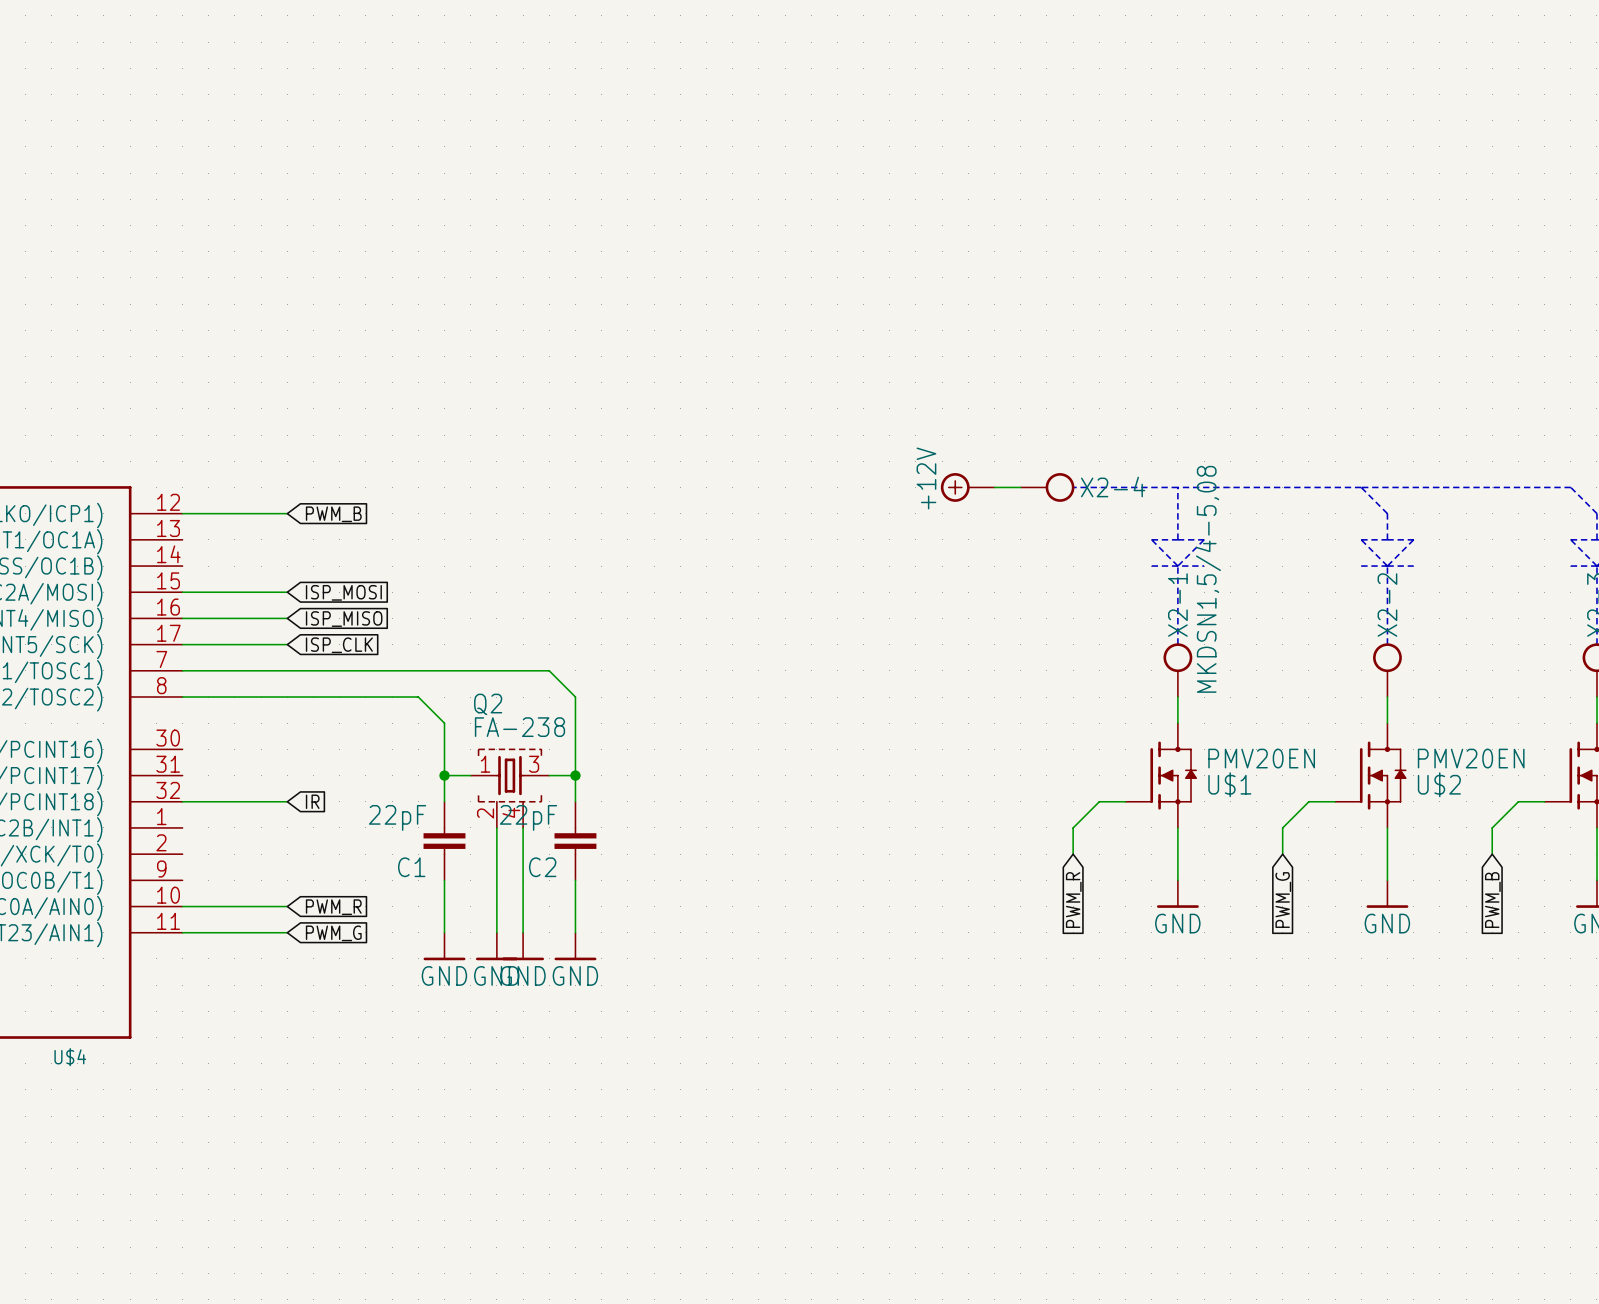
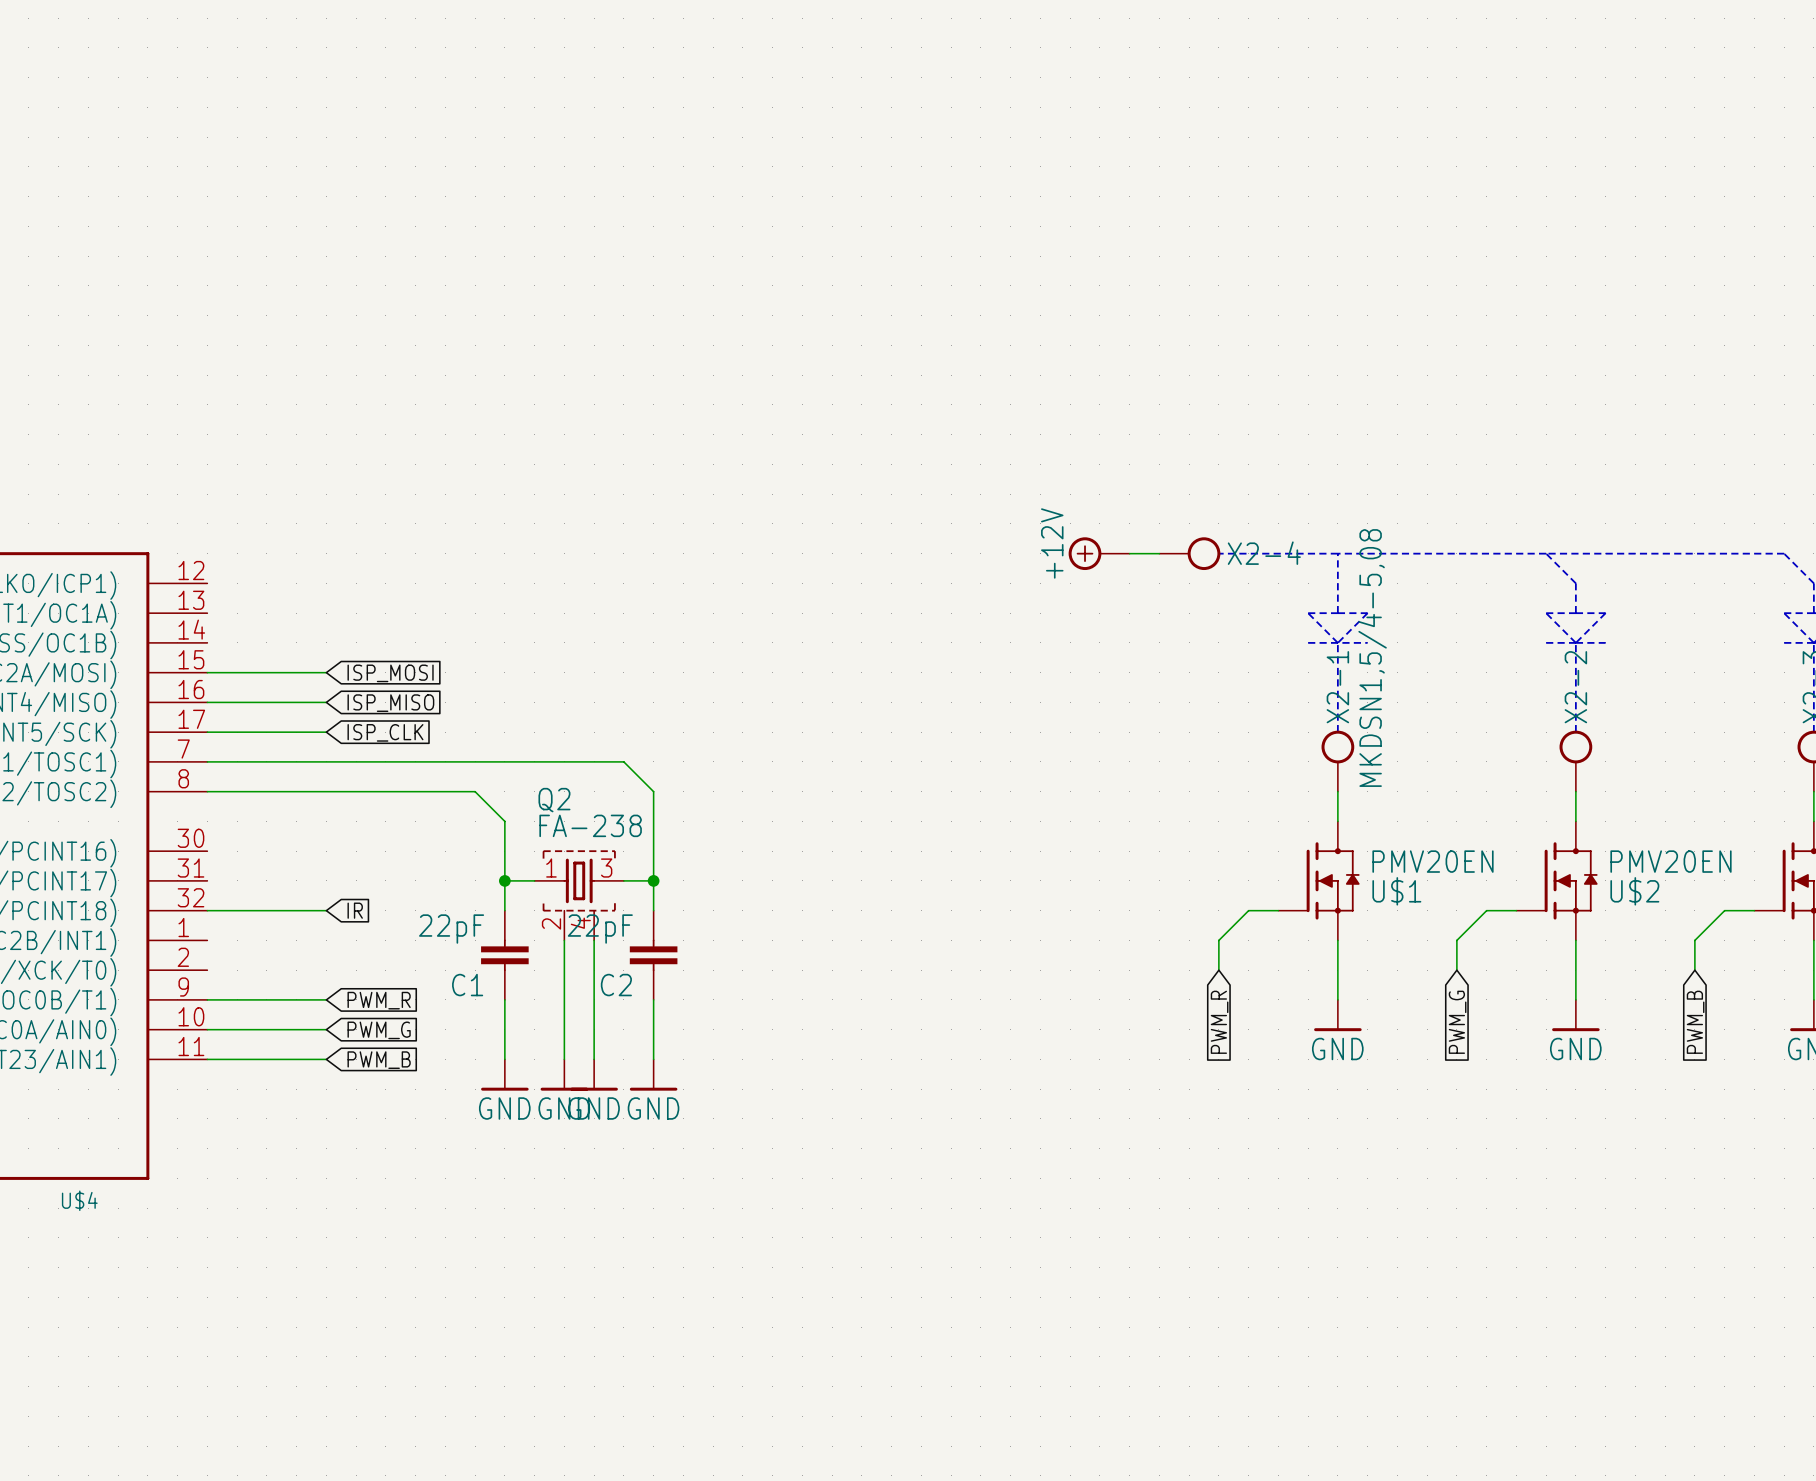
wire: (182, 513) (287, 513) -> none
global label: PWM_B (333, 514) -> none
wire: none -> (207, 999) (326, 999)
global label: none -> PWM_R (379, 1000)
global label: PWM_R (333, 907) -> PWM_G (379, 1030)
global label: PWM_G (333, 933) -> PWM_B (379, 1060)

